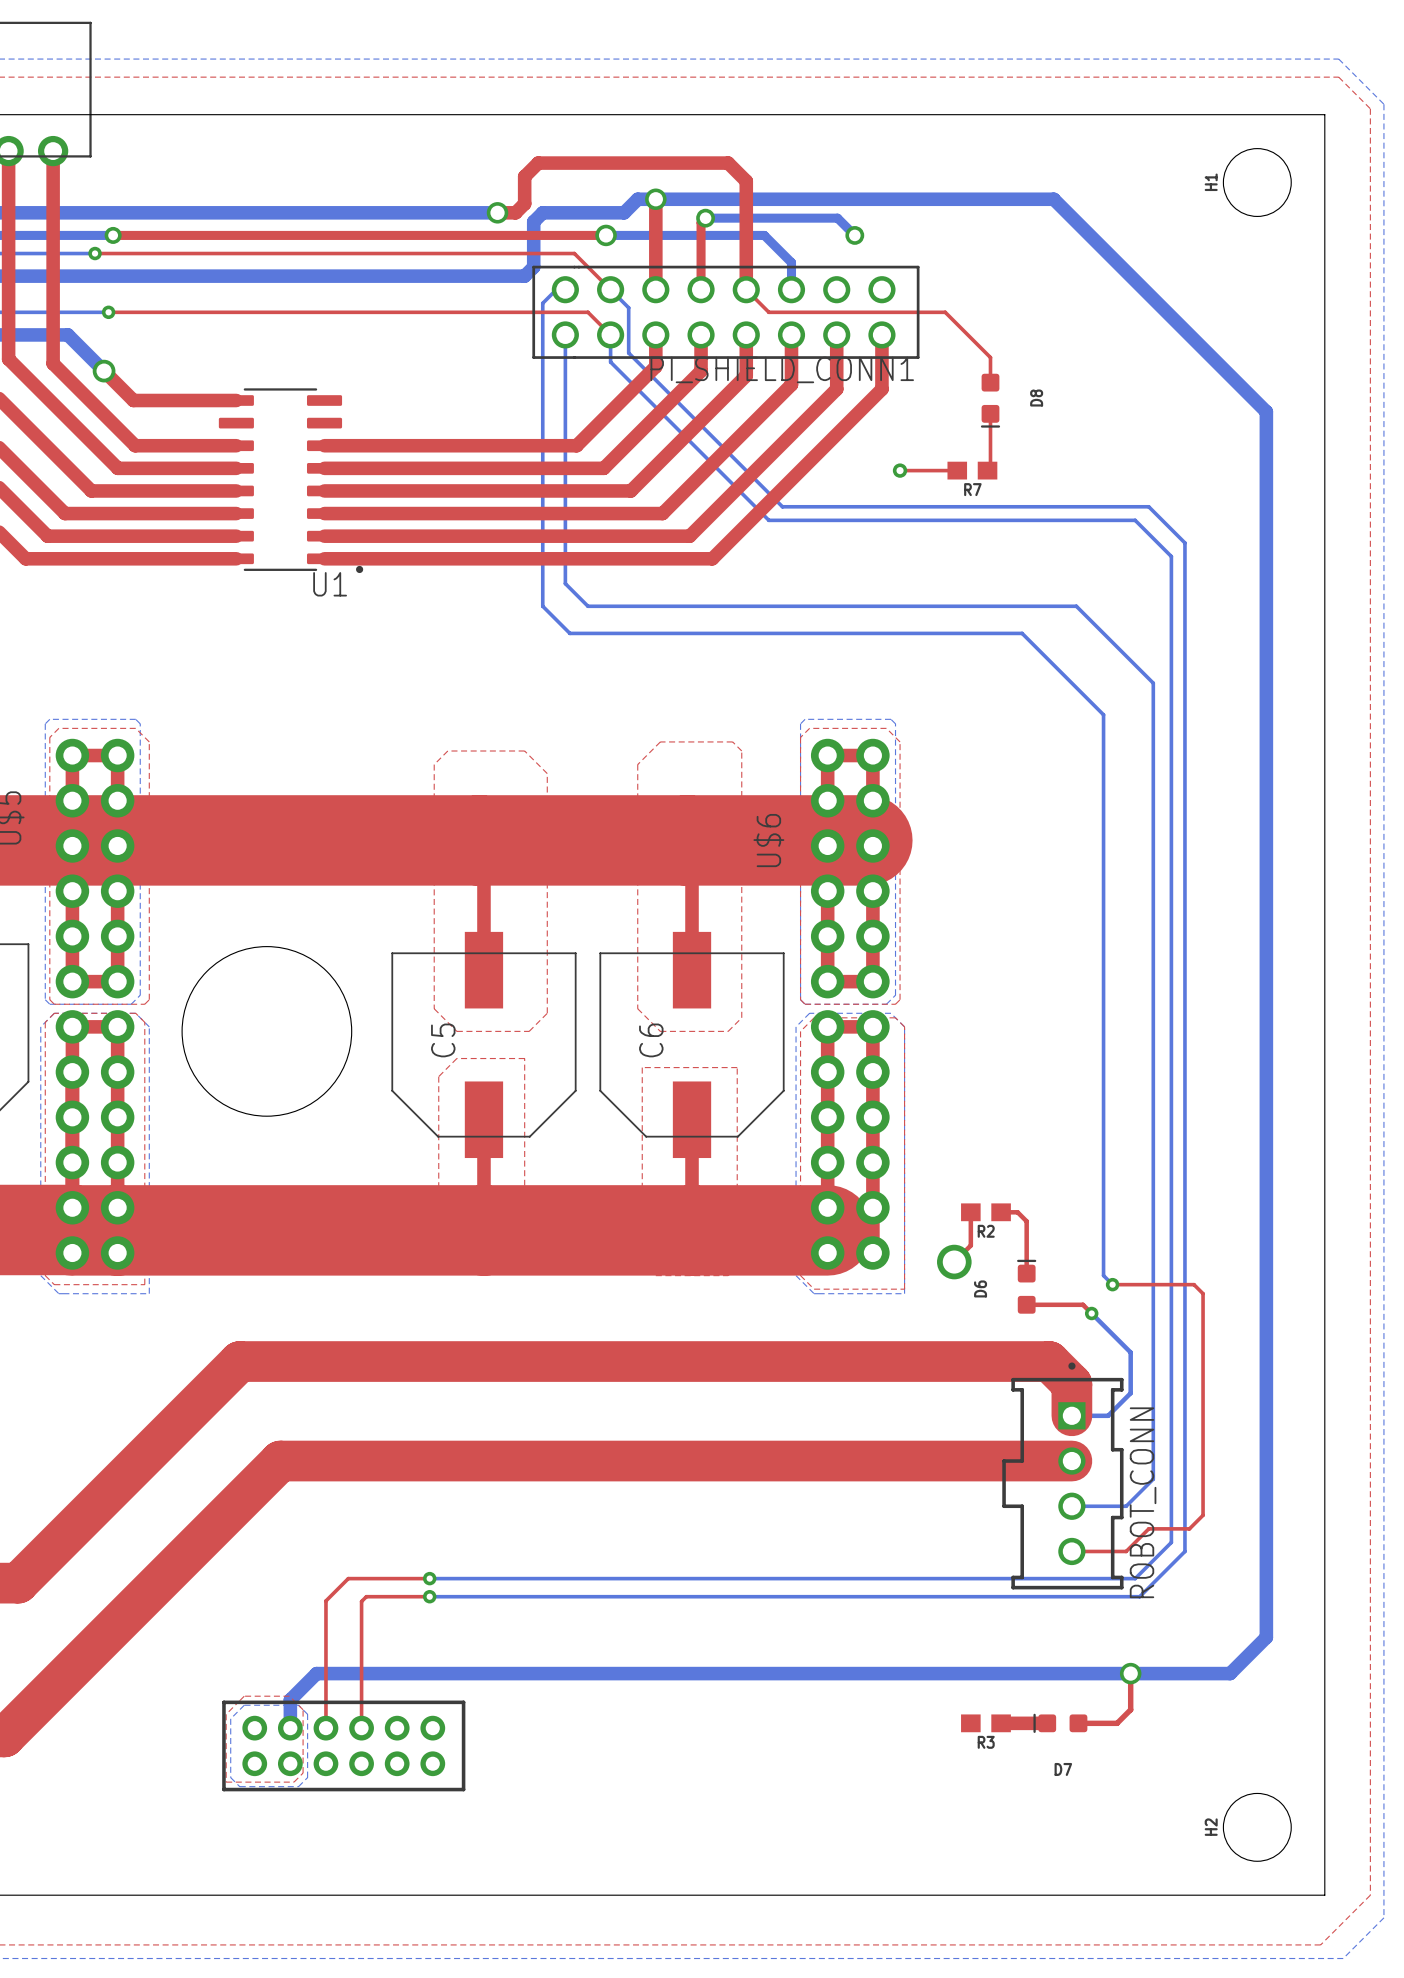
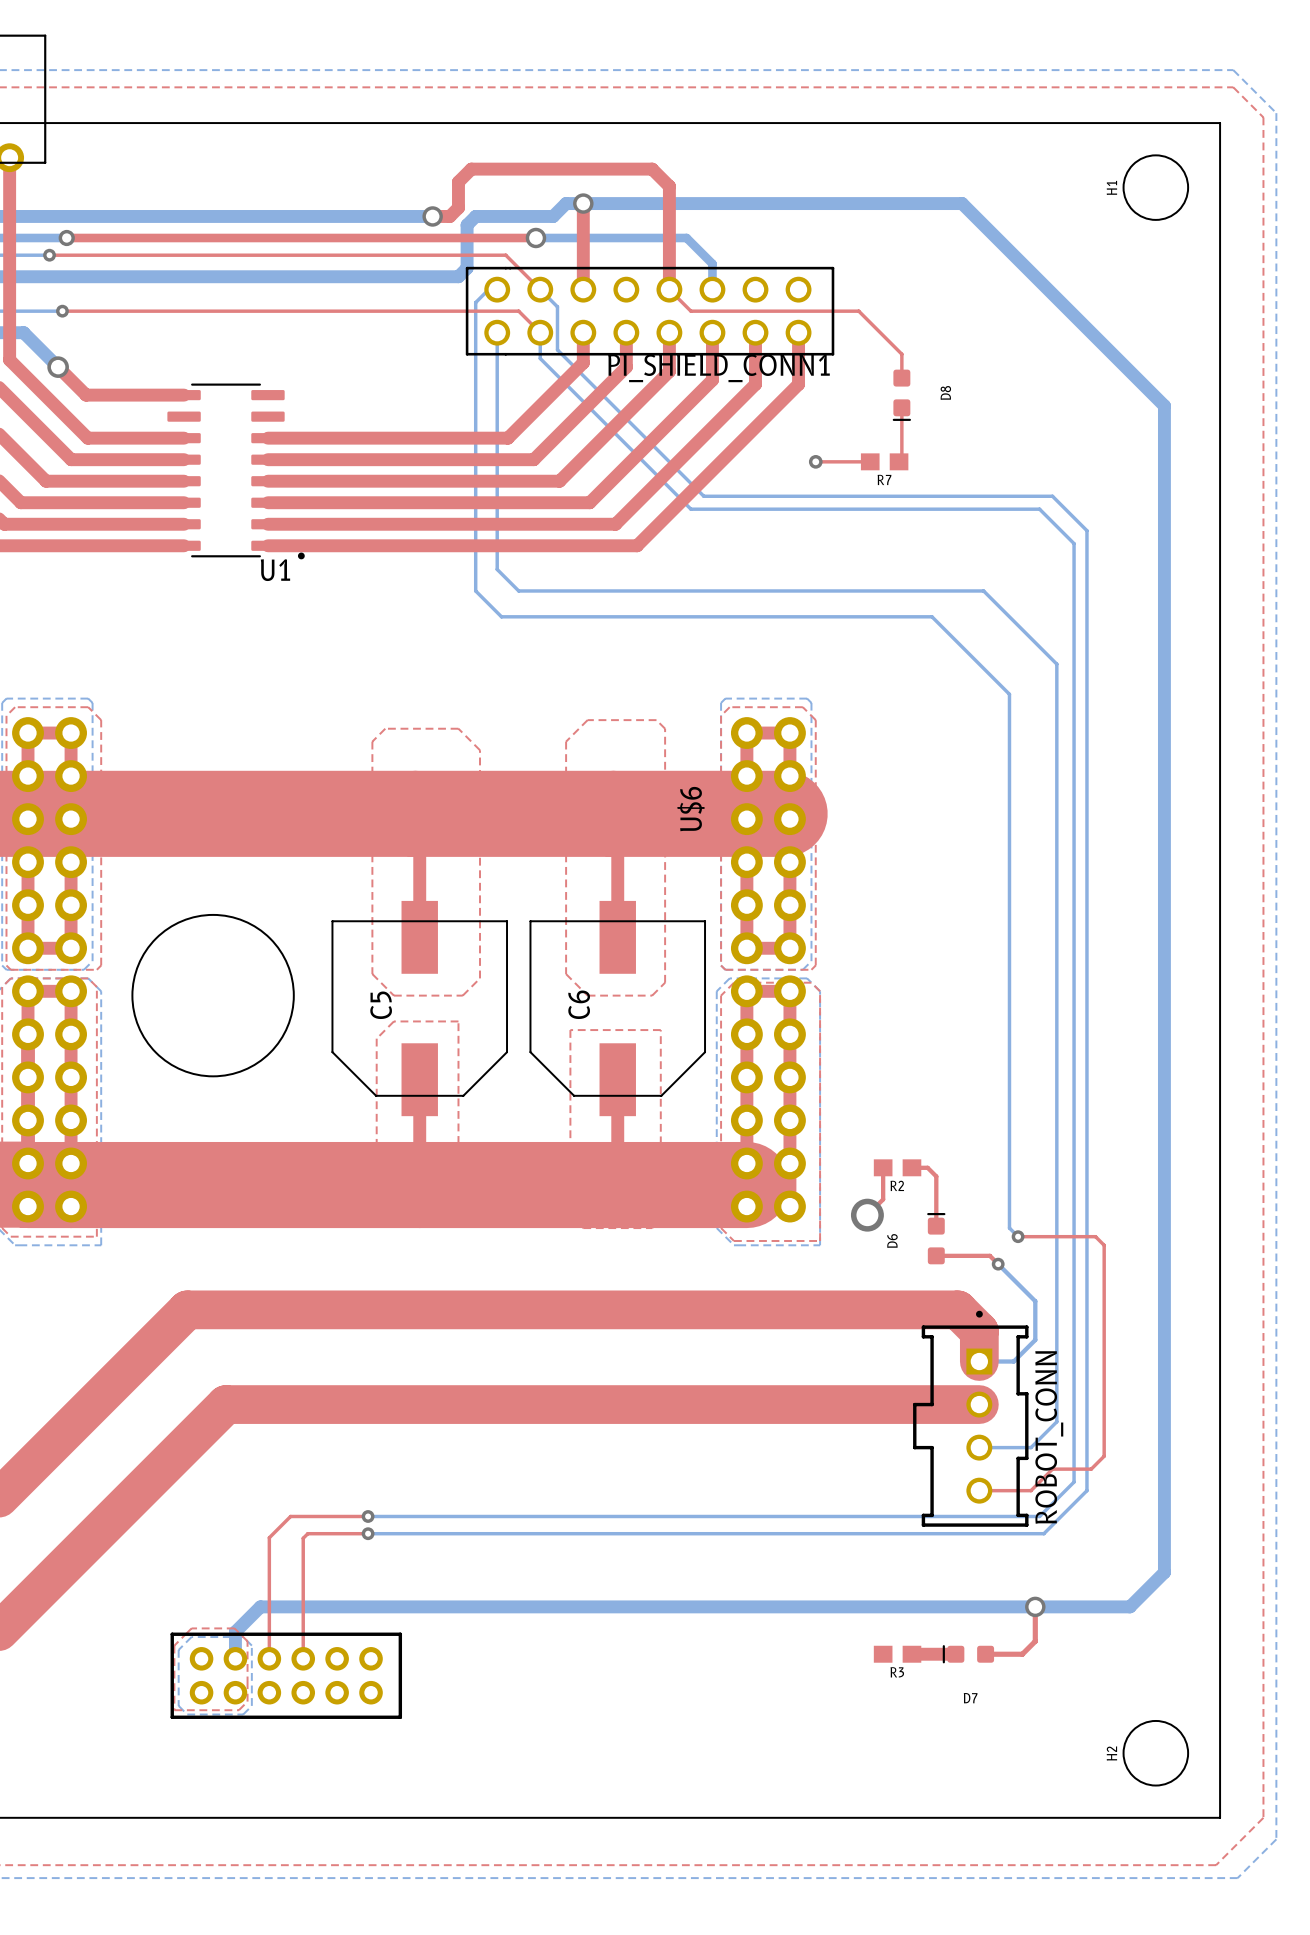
bottom track: (705, 218) (837, 218) (854, 235) -> none
top track: (705, 218) (701, 222) (701, 289) -> none
via: (705, 218) -> none
via: (854, 235) -> none

